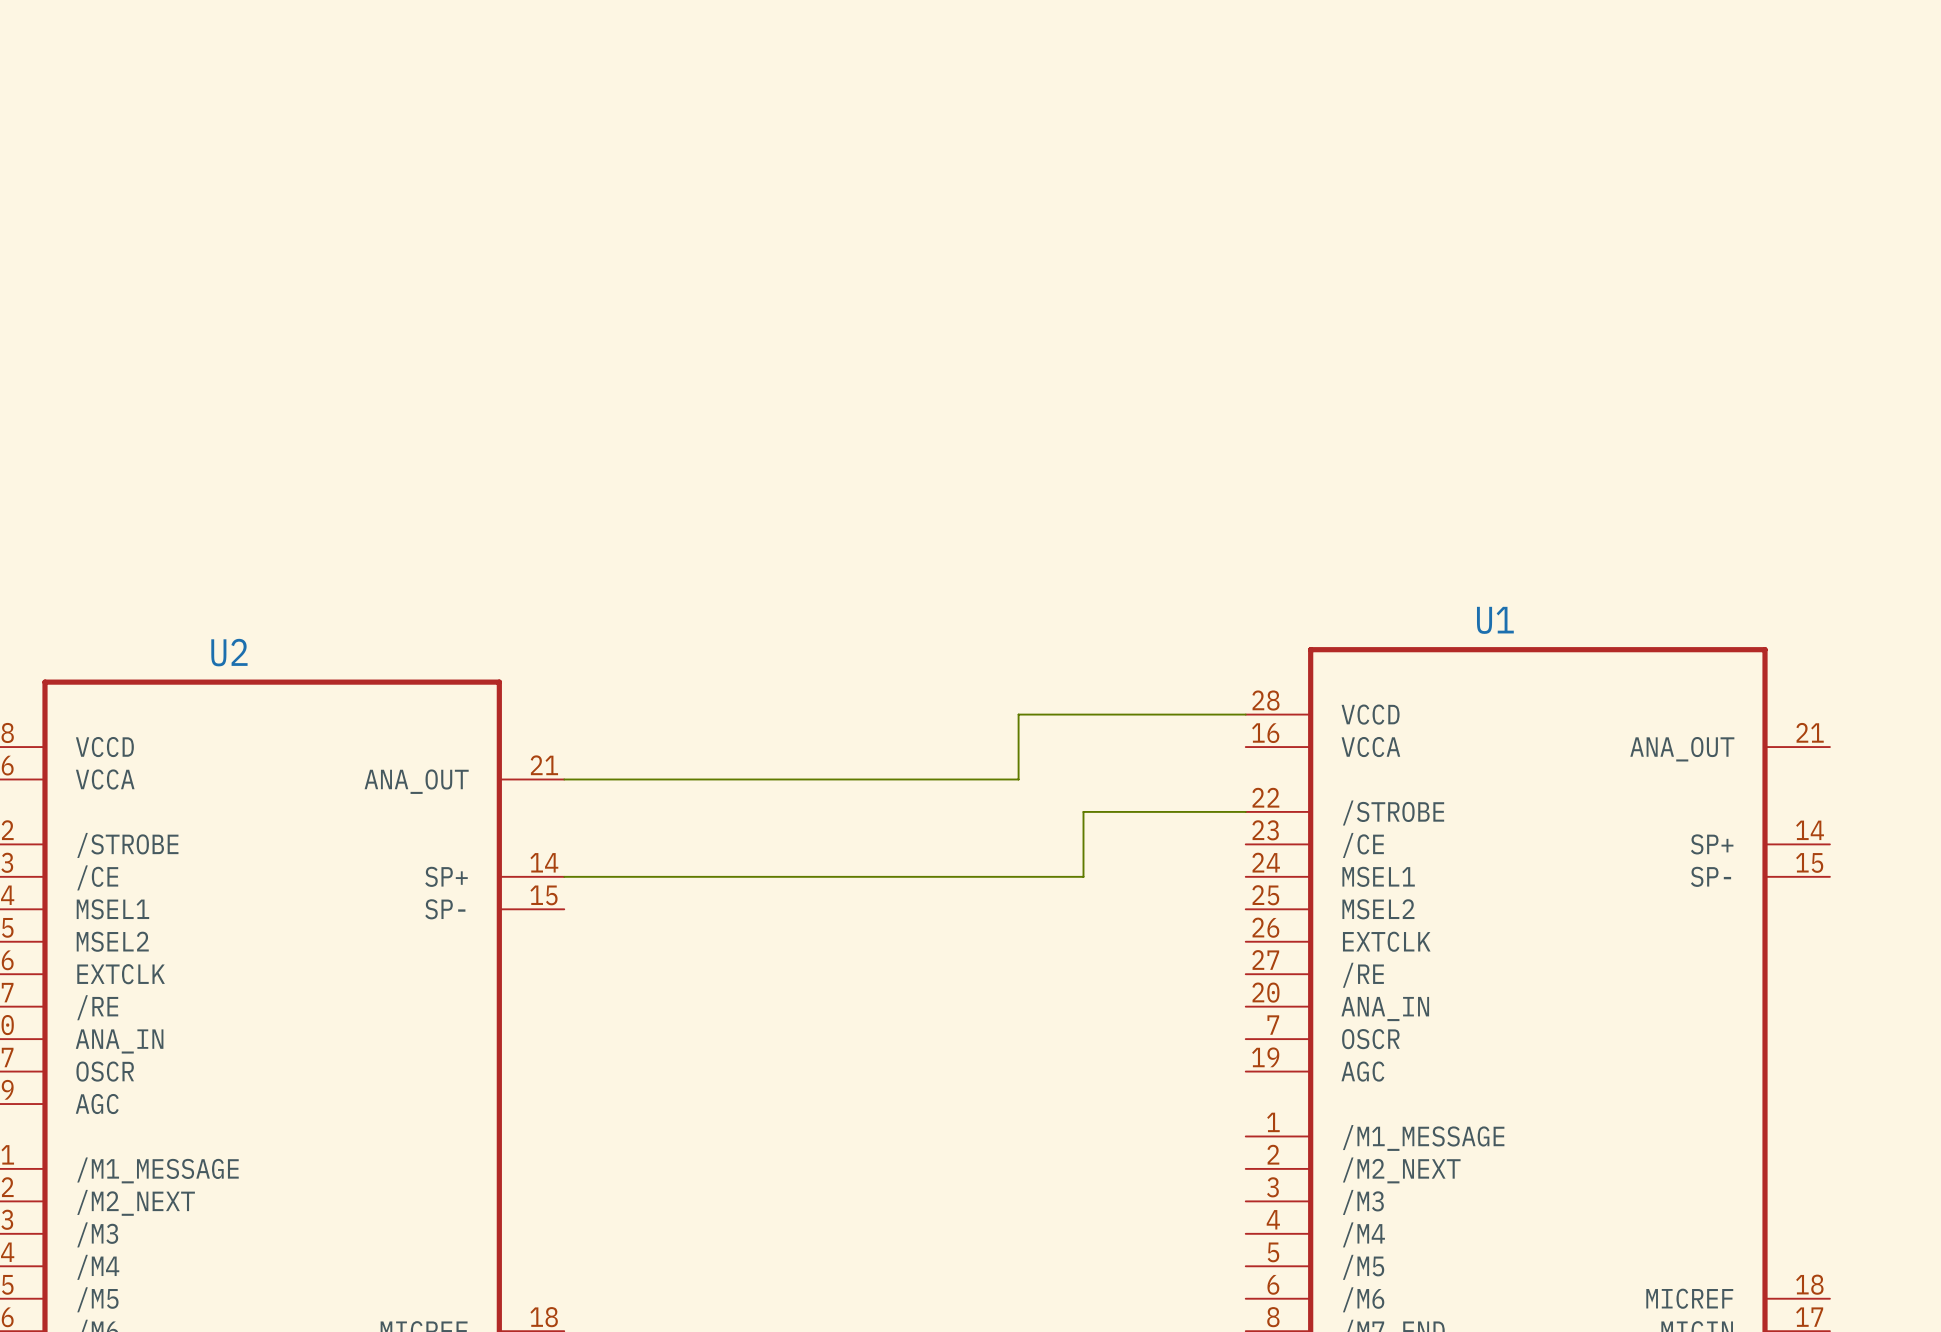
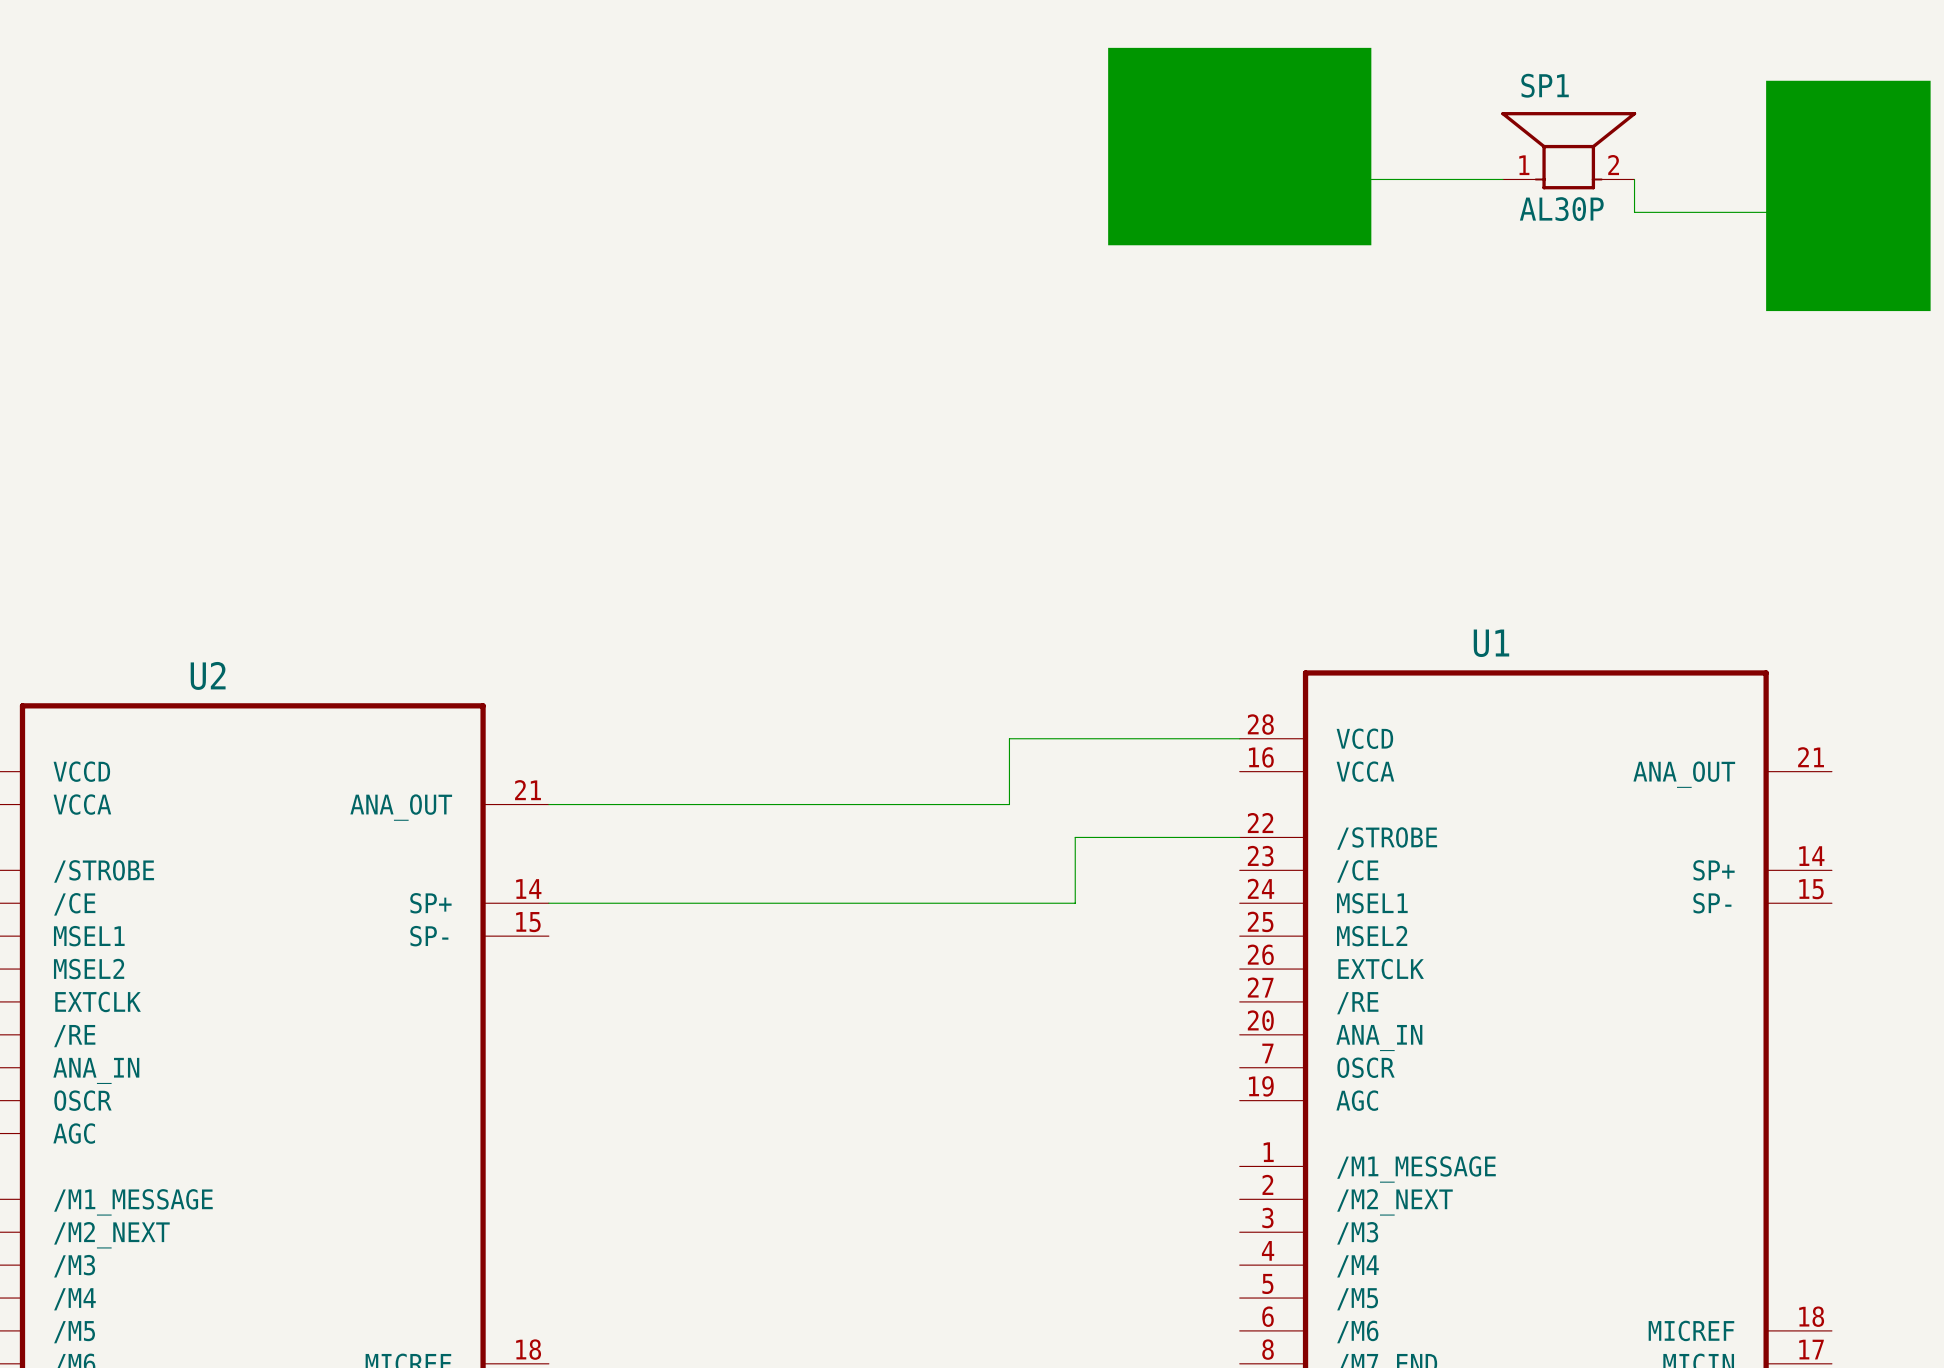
drawing: none -> [1108, 47, 1372, 246]
drawing: none -> [1766, 80, 1931, 312]
SP1: none -> AL30P (1568, 150)
wire: none -> (1371, 179) (1502, 179)
wire: none -> (1634, 179) (1634, 212) (1831, 212)

